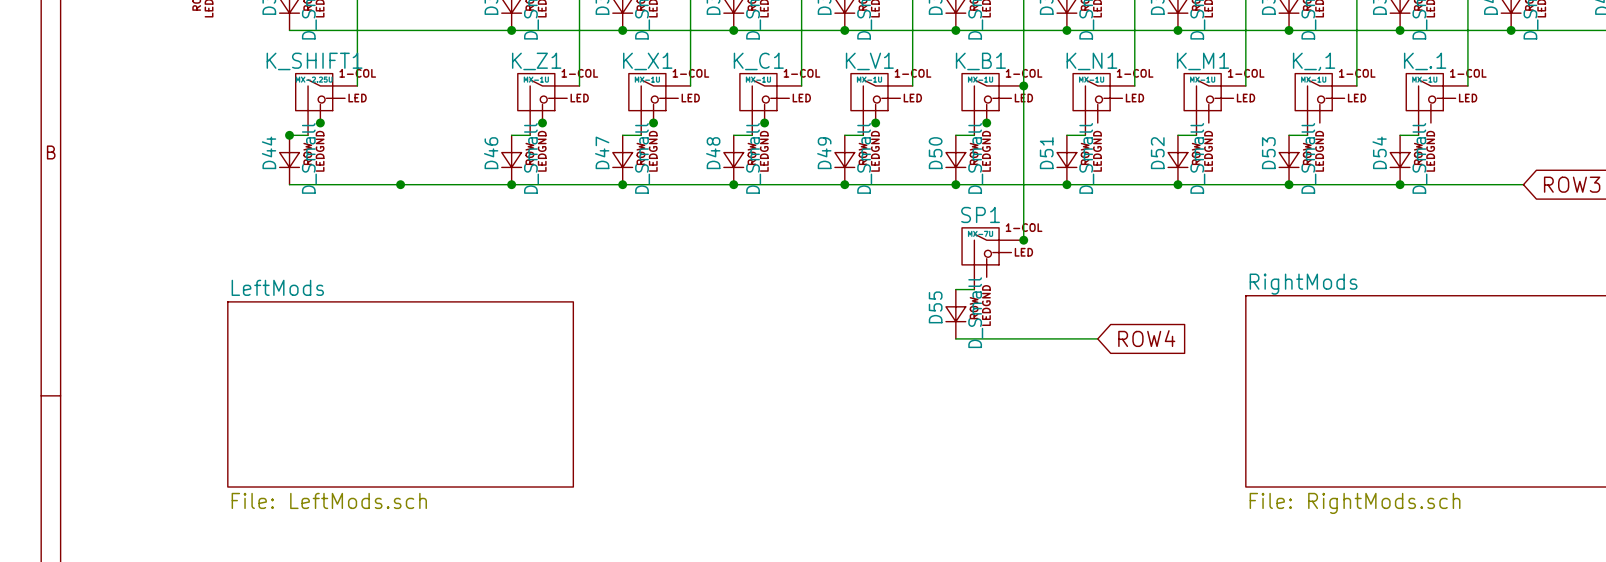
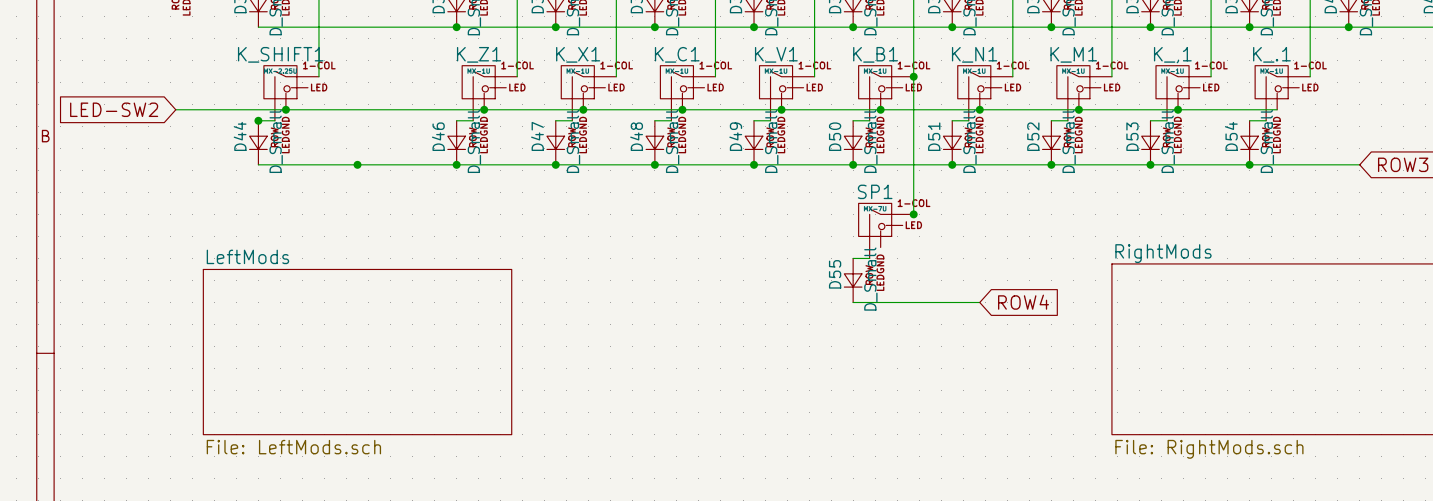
global label: none -> LED-SW2 (114, 109)
wire: none -> (175, 109) (1277, 109)
junction: none -> (979, 109)
junction: none -> (1078, 109)
junction: none -> (1178, 109)

